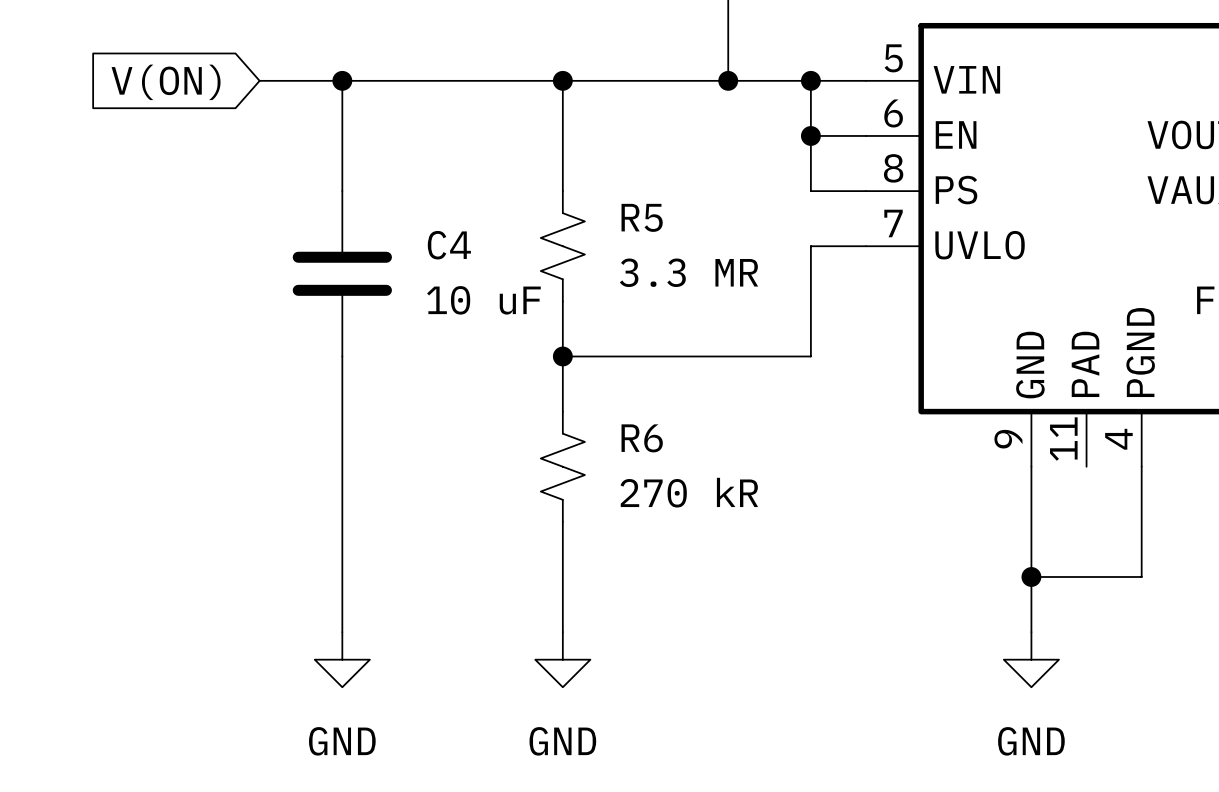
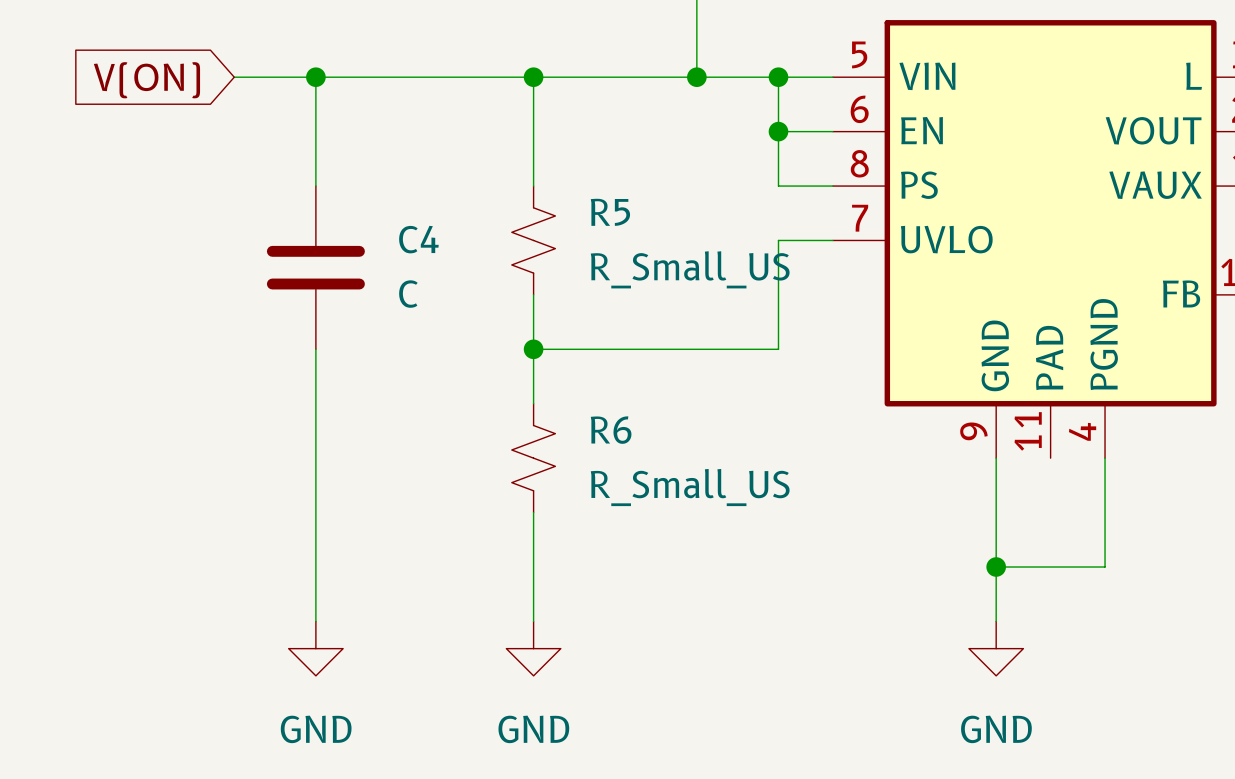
R5 value: 3.3 MR (689, 272) -> R_Small_US (690, 269)
C4 value: 10 uF (483, 300) -> C (408, 294)
R6 value: 270 kR (689, 492) -> R_Small_US (690, 487)

